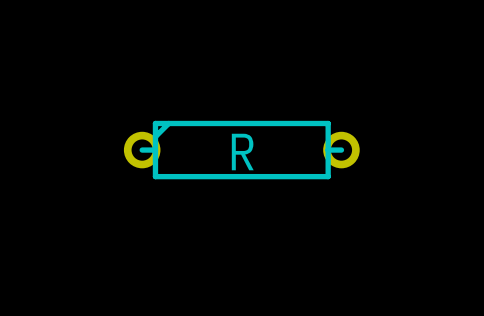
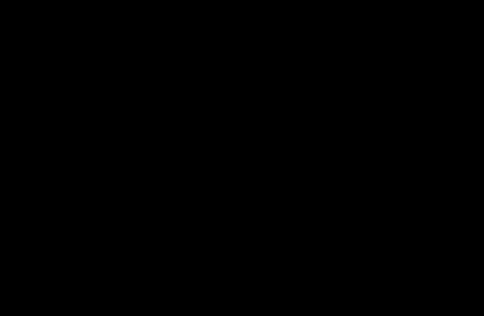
part: R (241, 150) -> none

